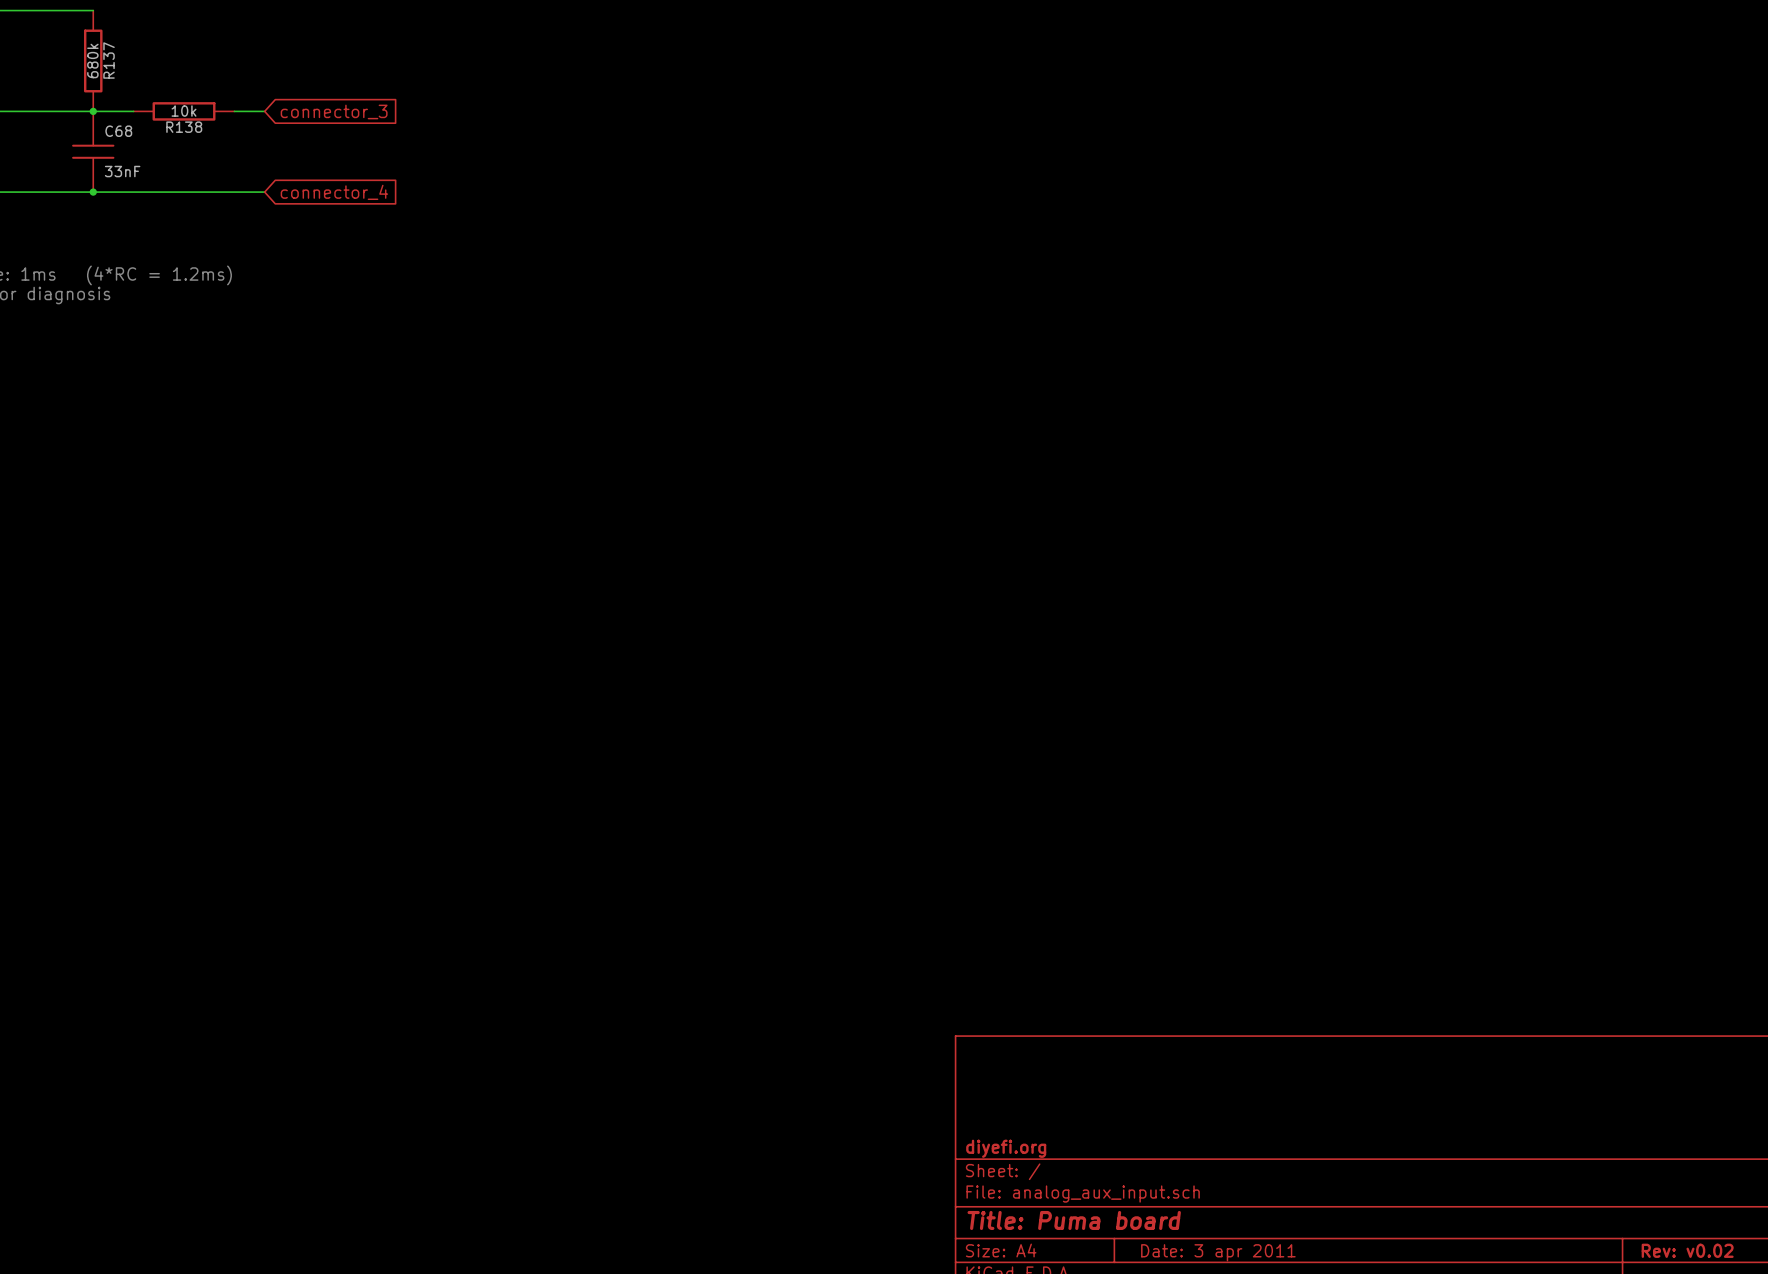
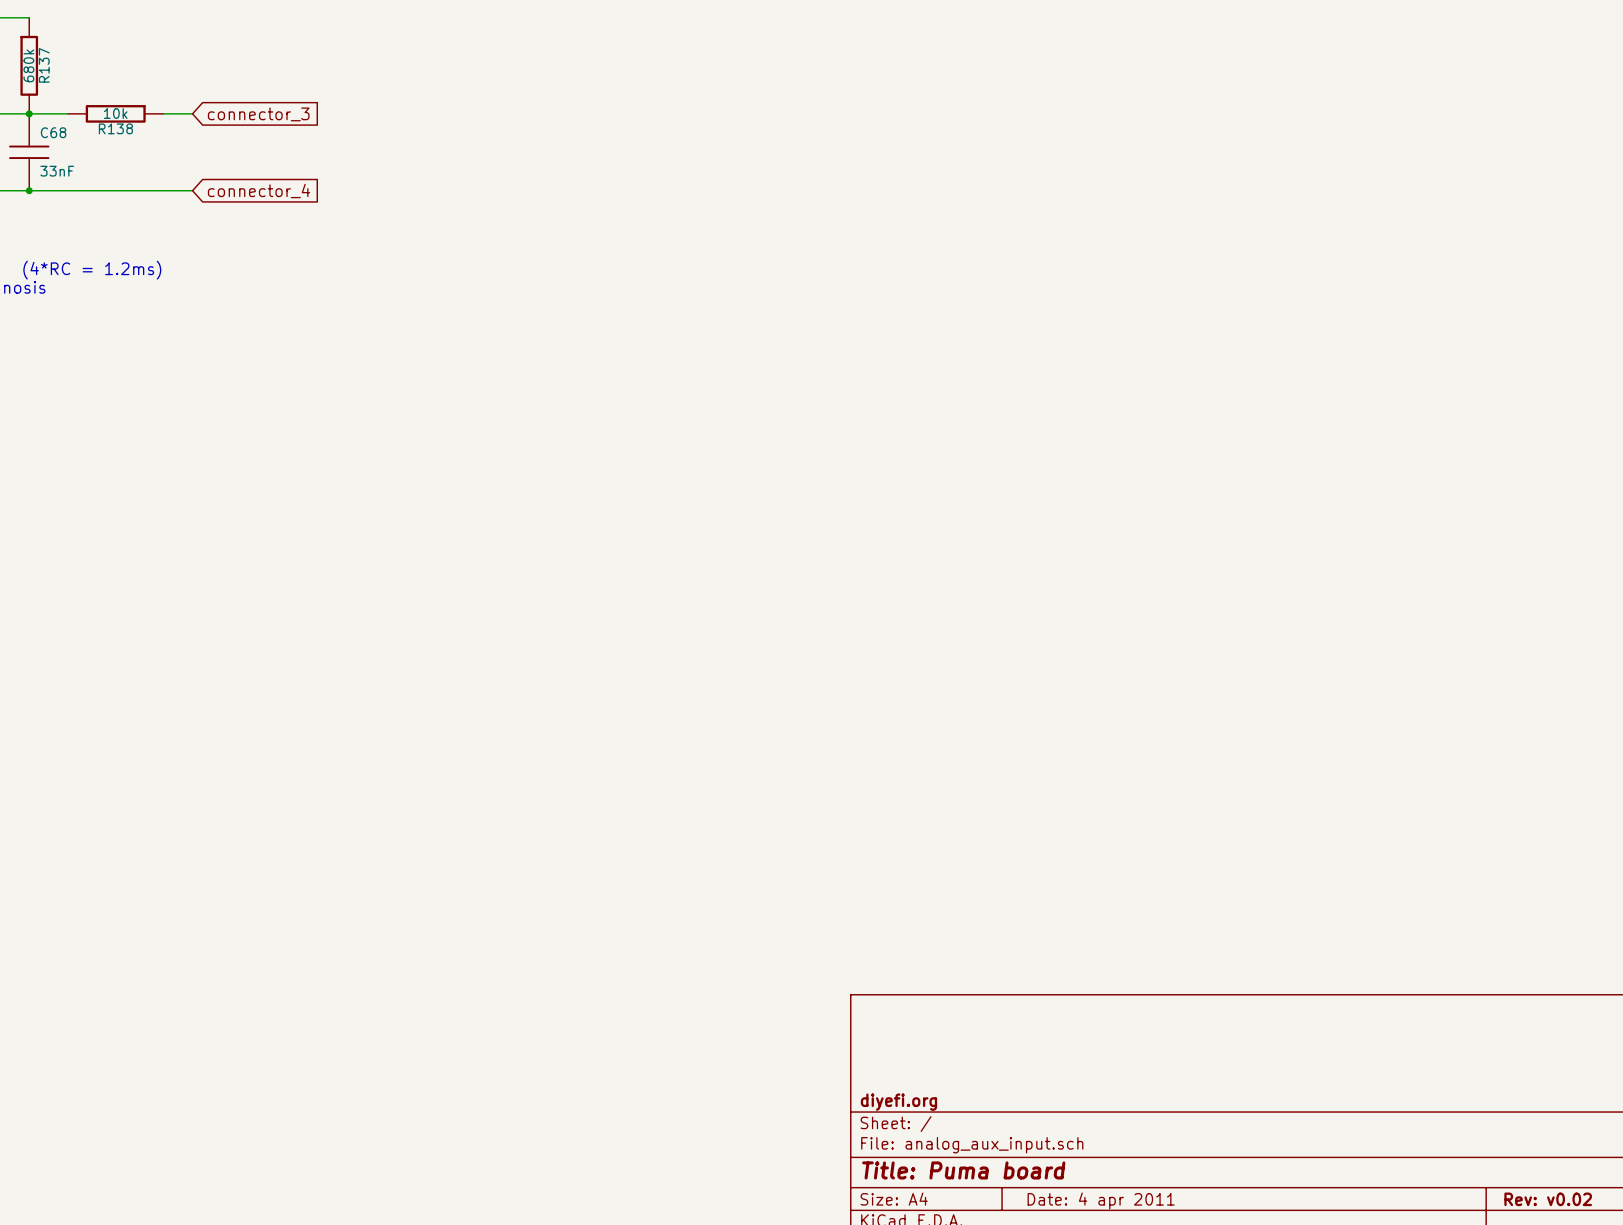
title block: Date: 3 apr 2011 (1218, 1252) -> Date: 4 apr 2011 (1101, 1200)

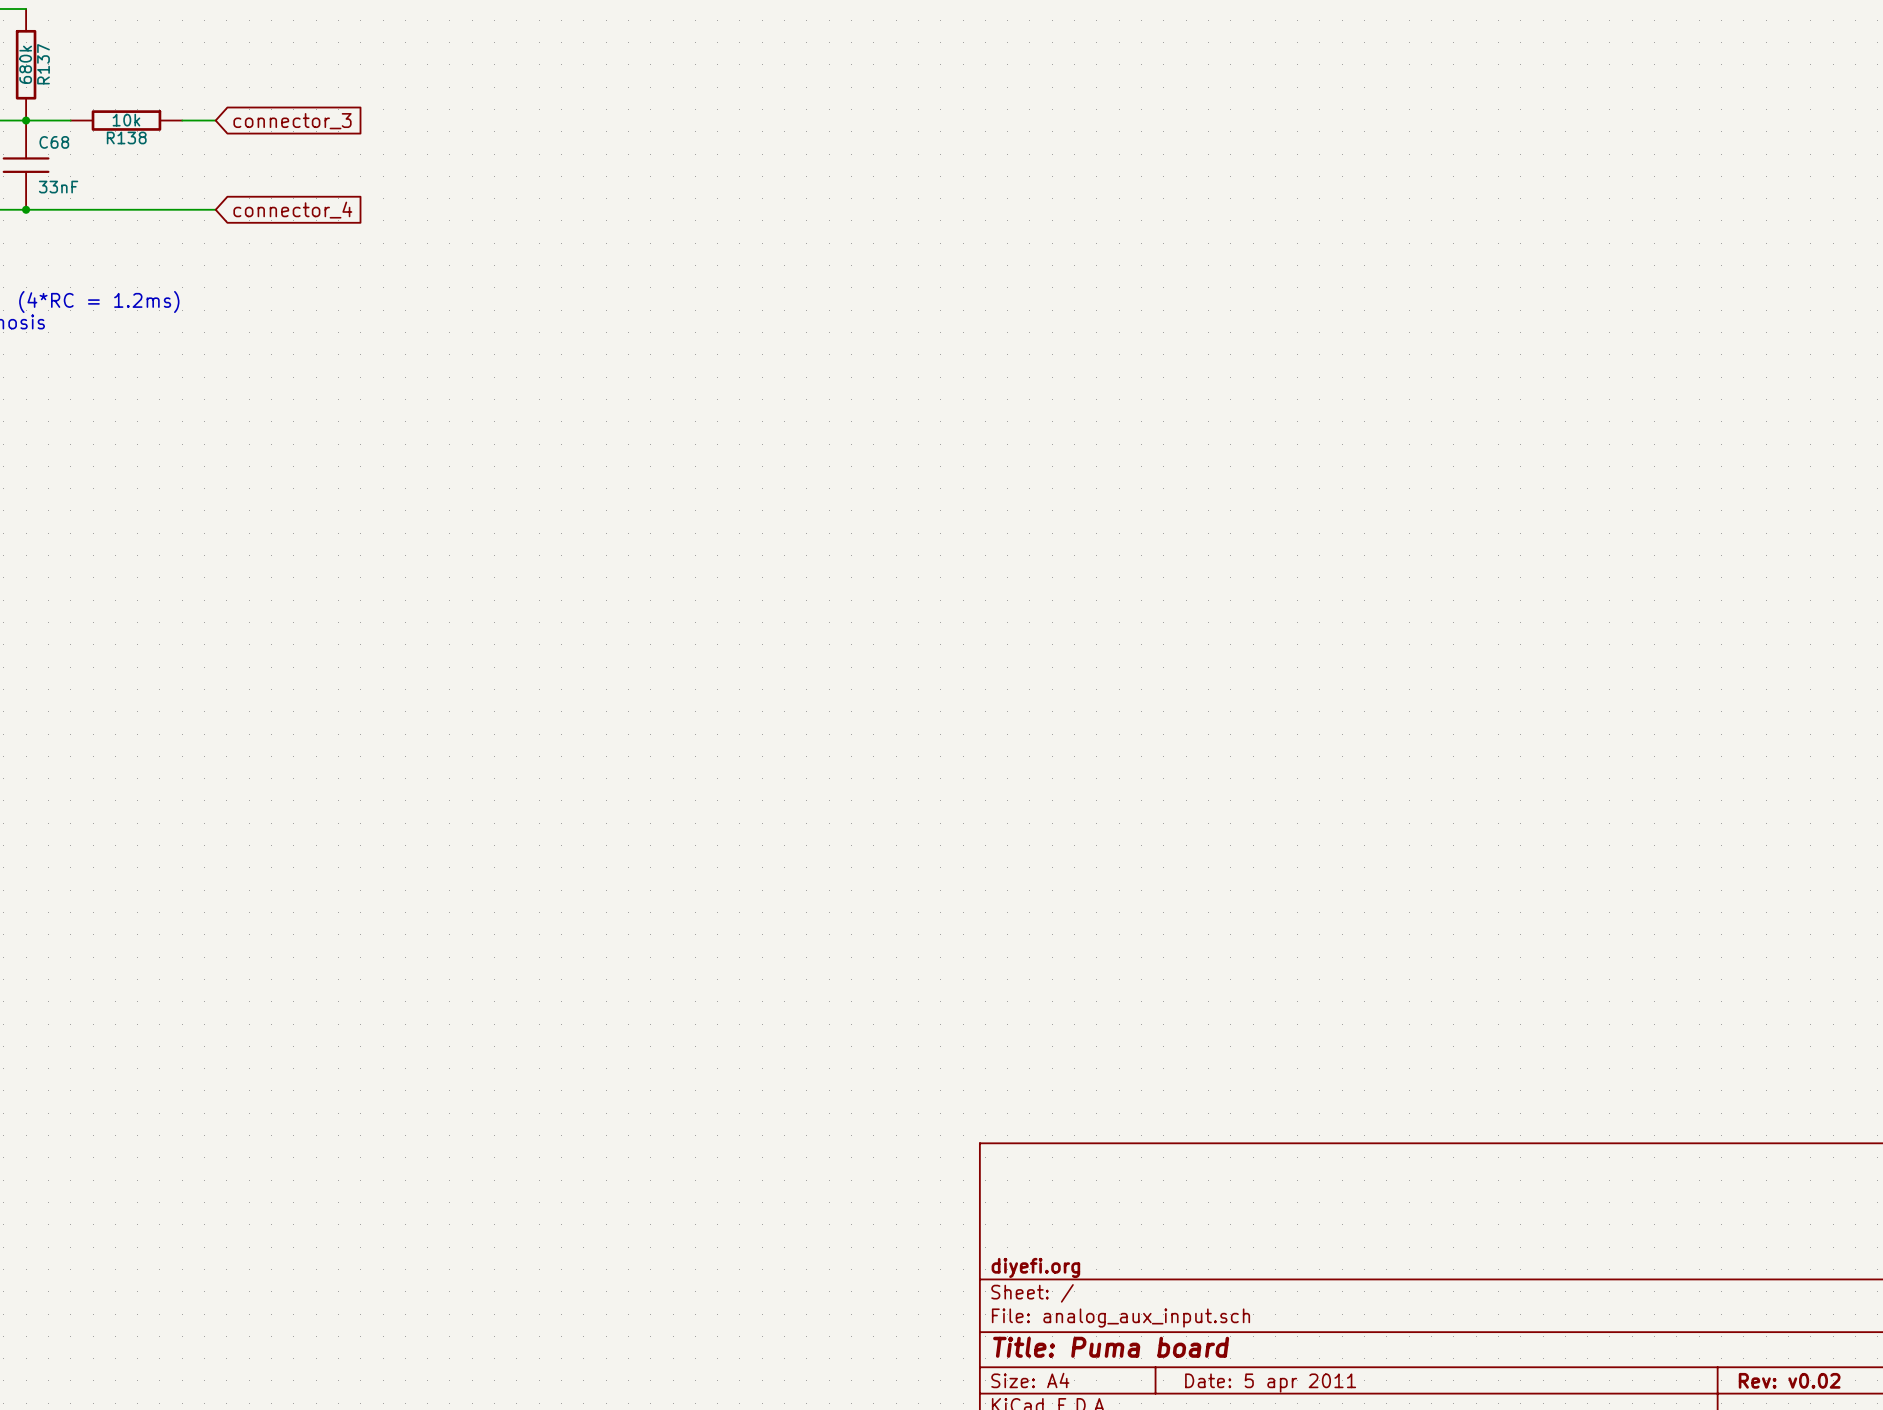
title block: Date: 4 apr 2011 (1101, 1200) -> Date: 5 apr 2011 (1270, 1383)

